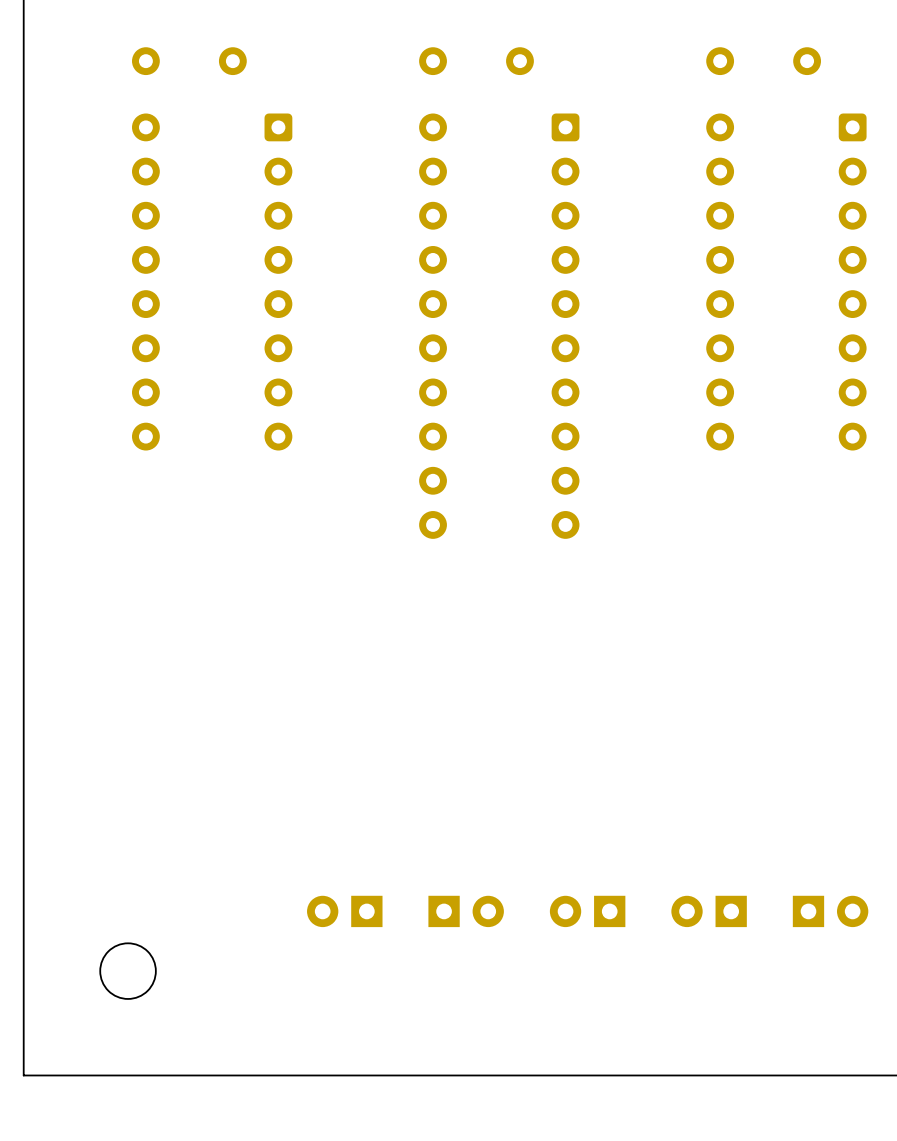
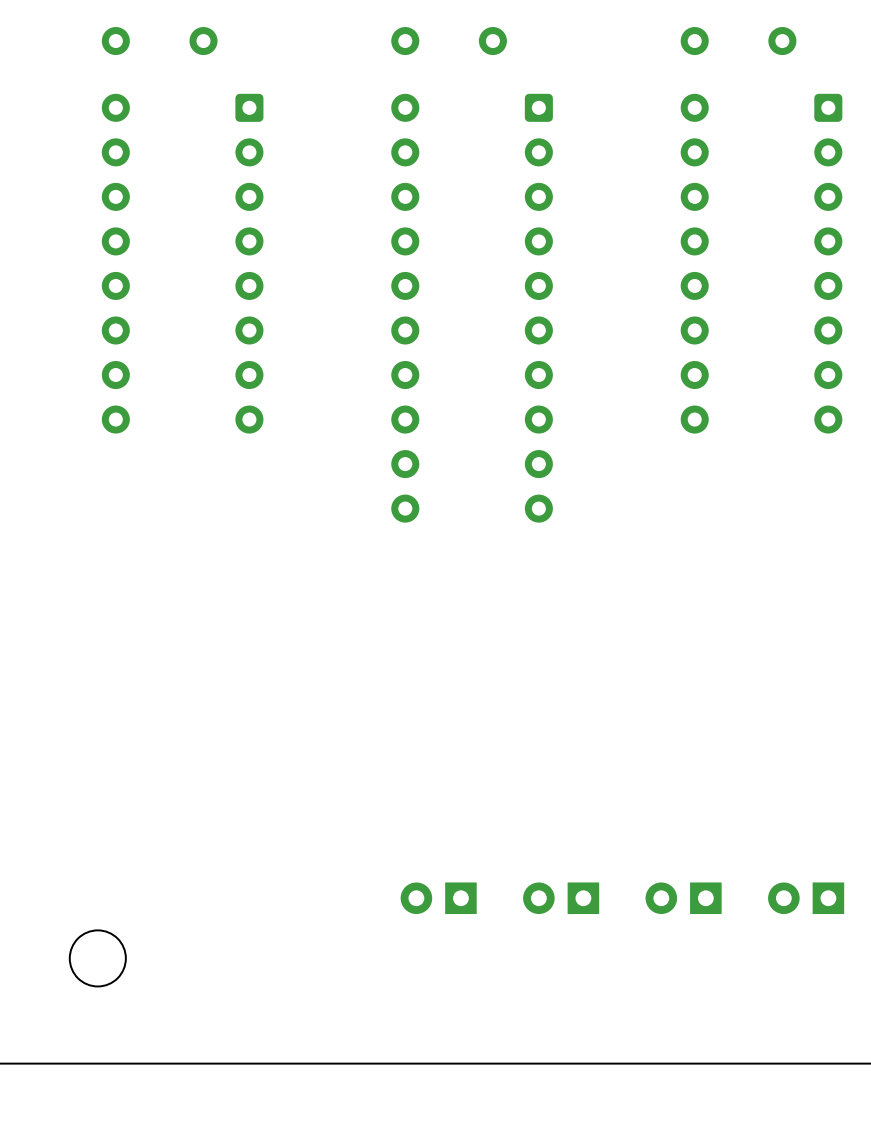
part: (344, 911) -> none
part rotation: 0° (466, 911) -> 180° (438, 898)
part rotation: 0° (830, 911) -> 180° (806, 898)

